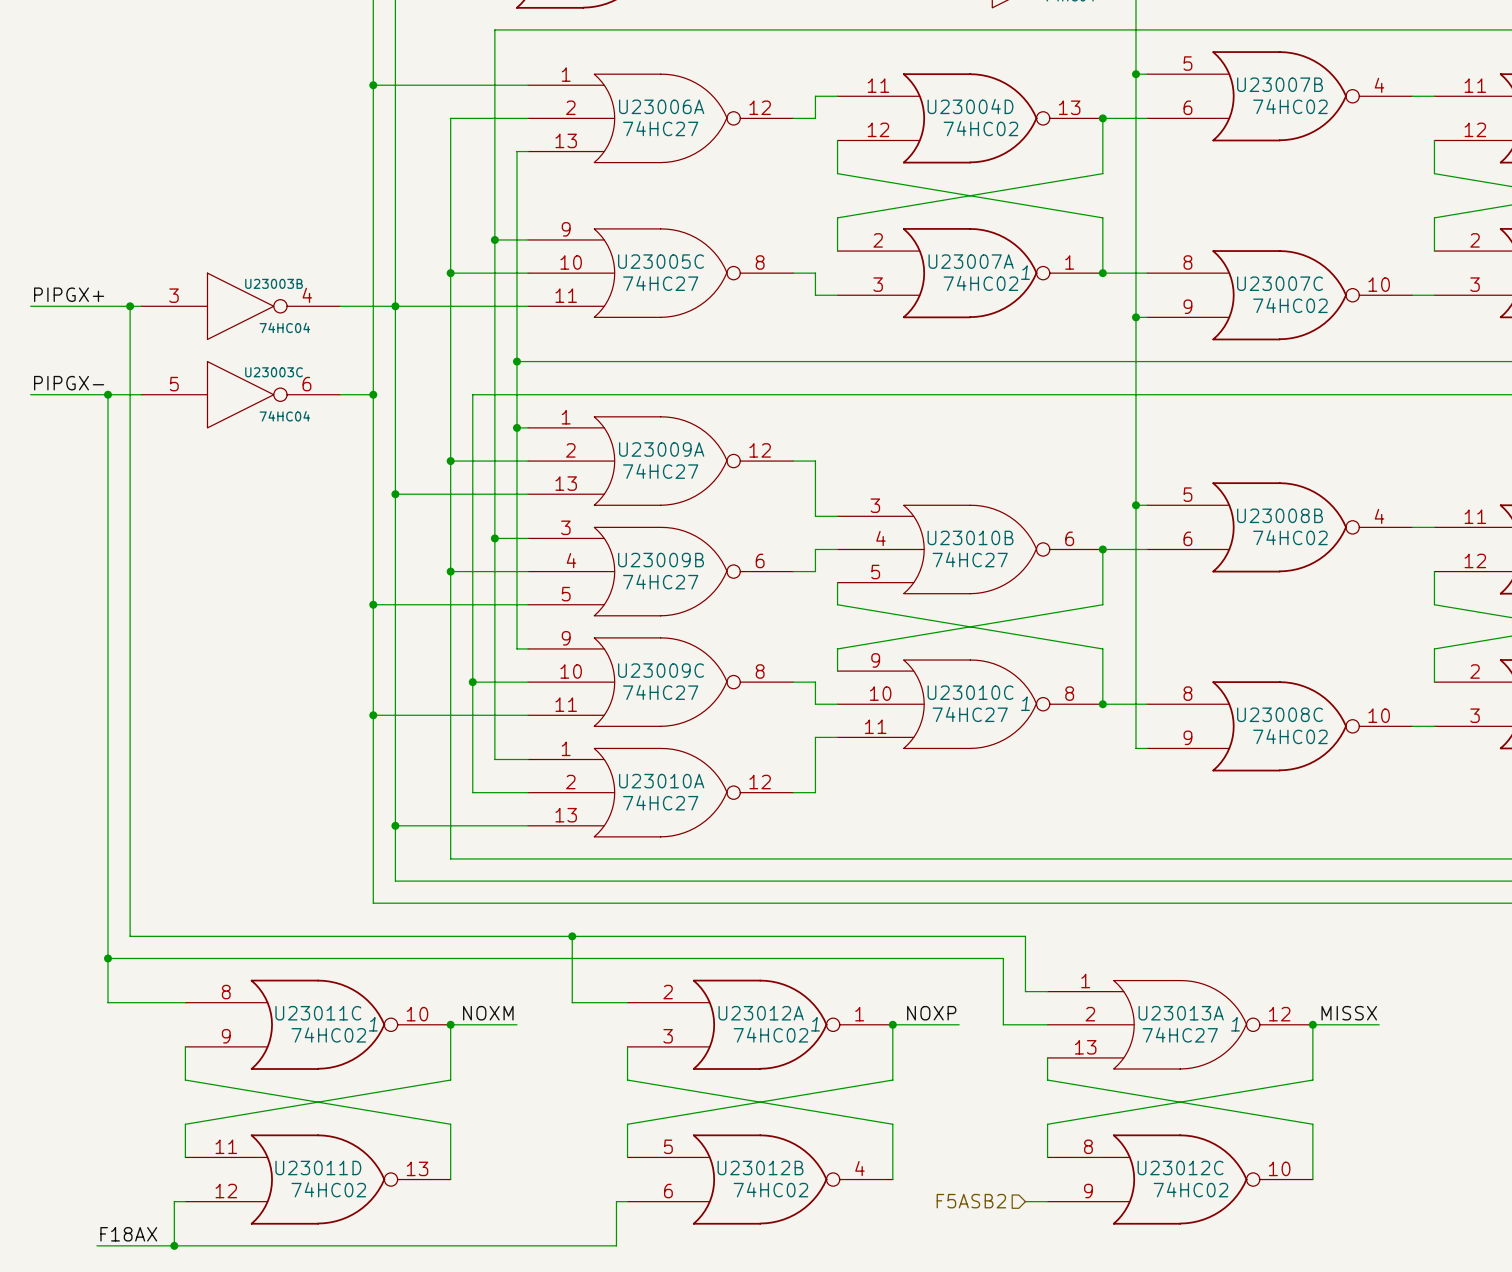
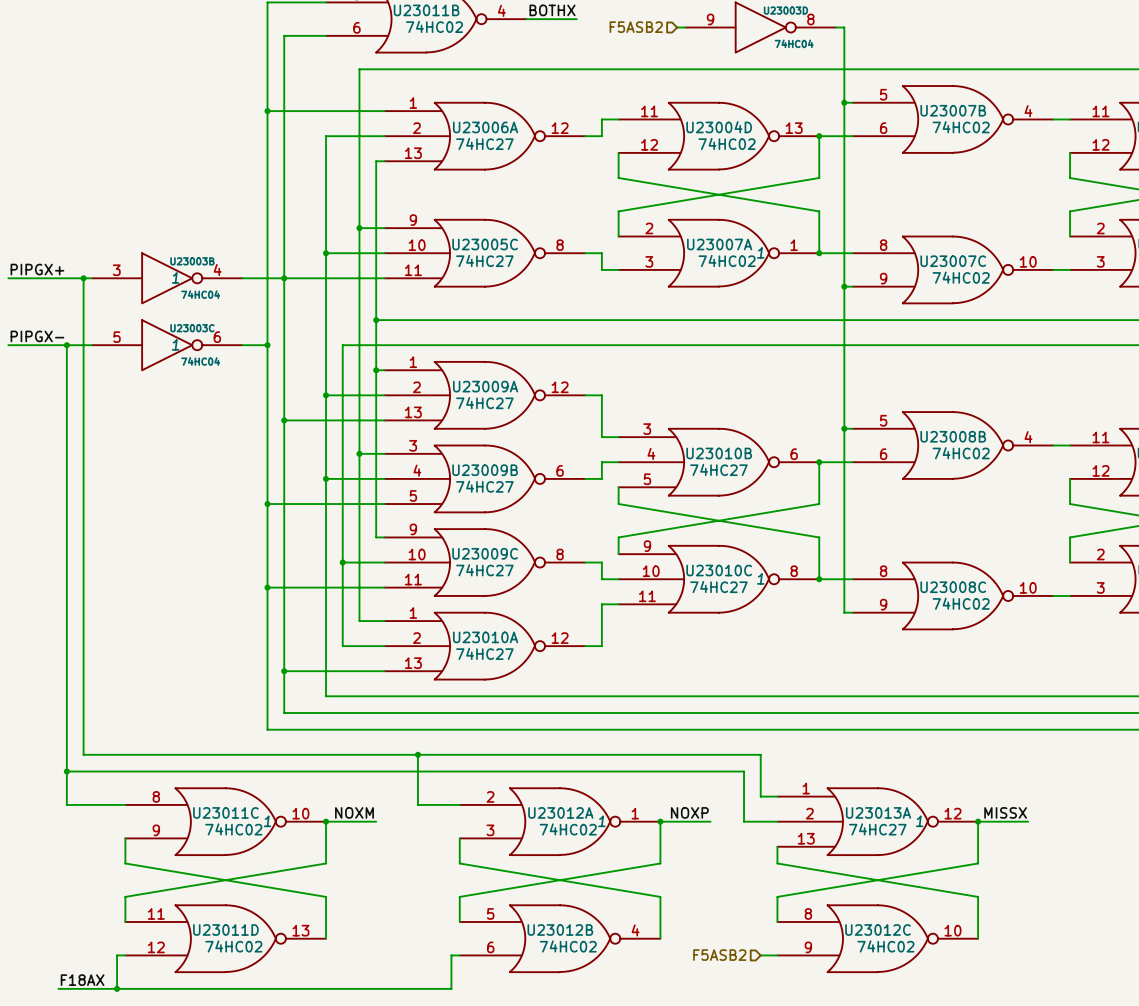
U23003B text: none -> 1 (175, 277)
U23003C text: none -> 1 (175, 344)

